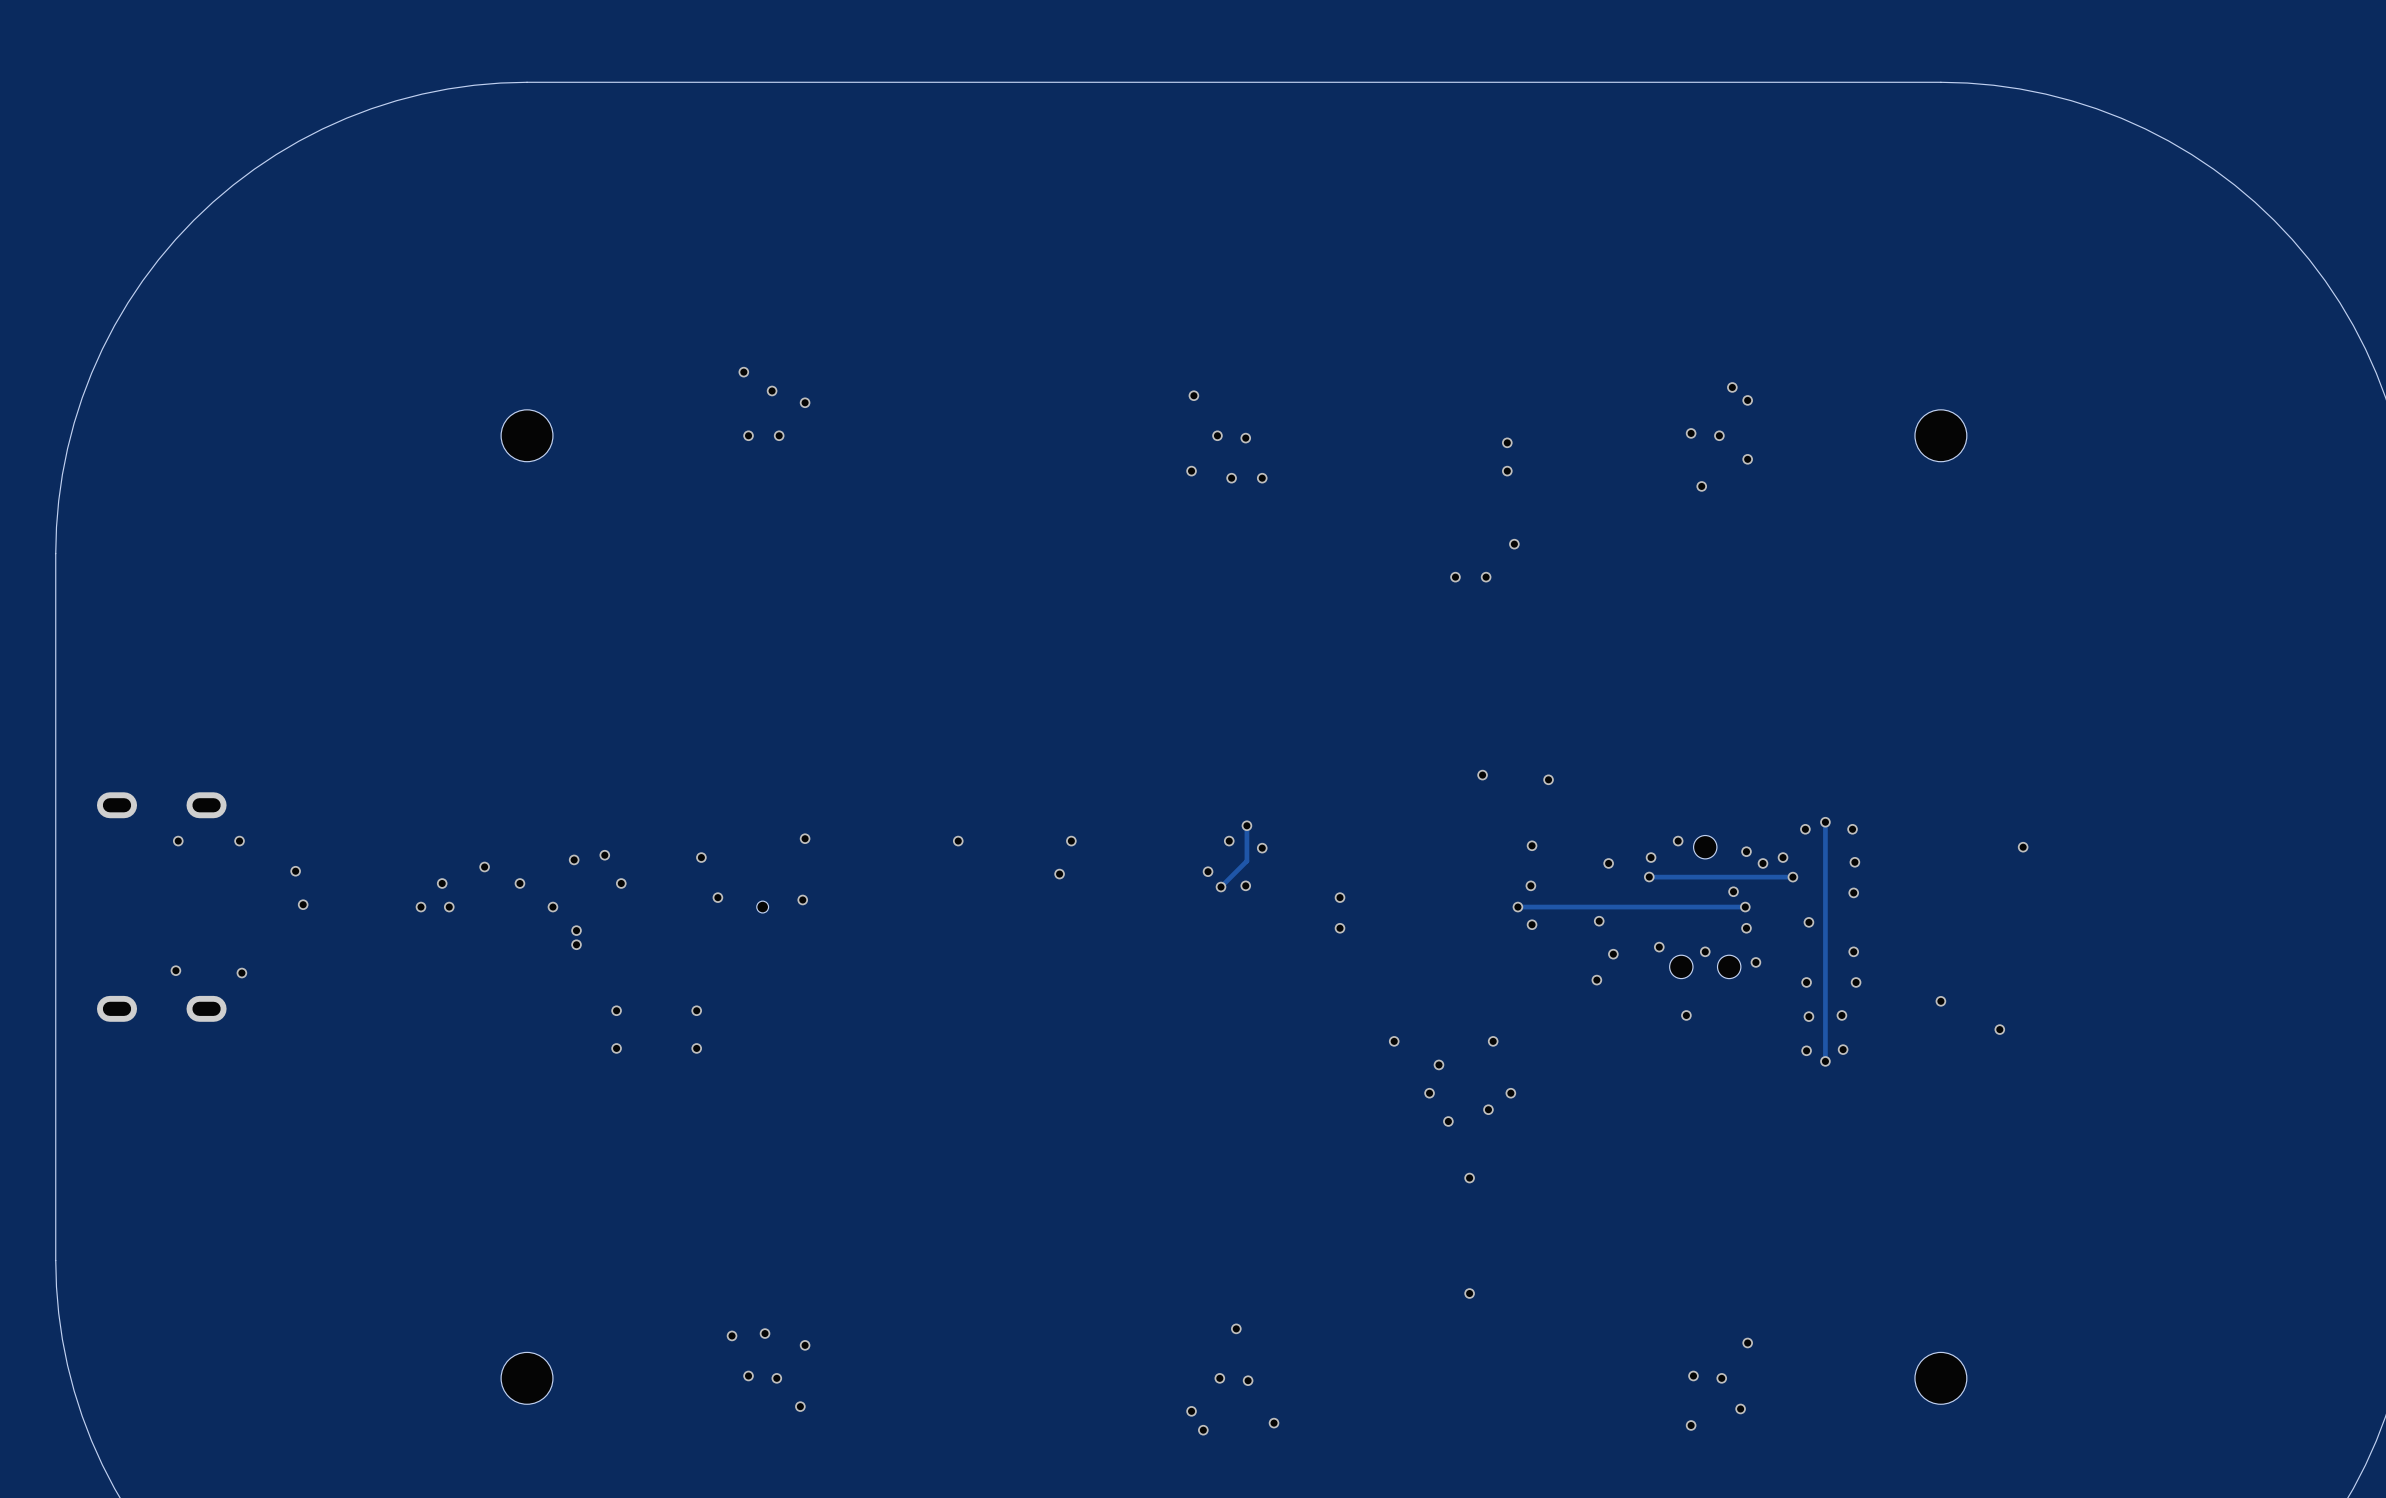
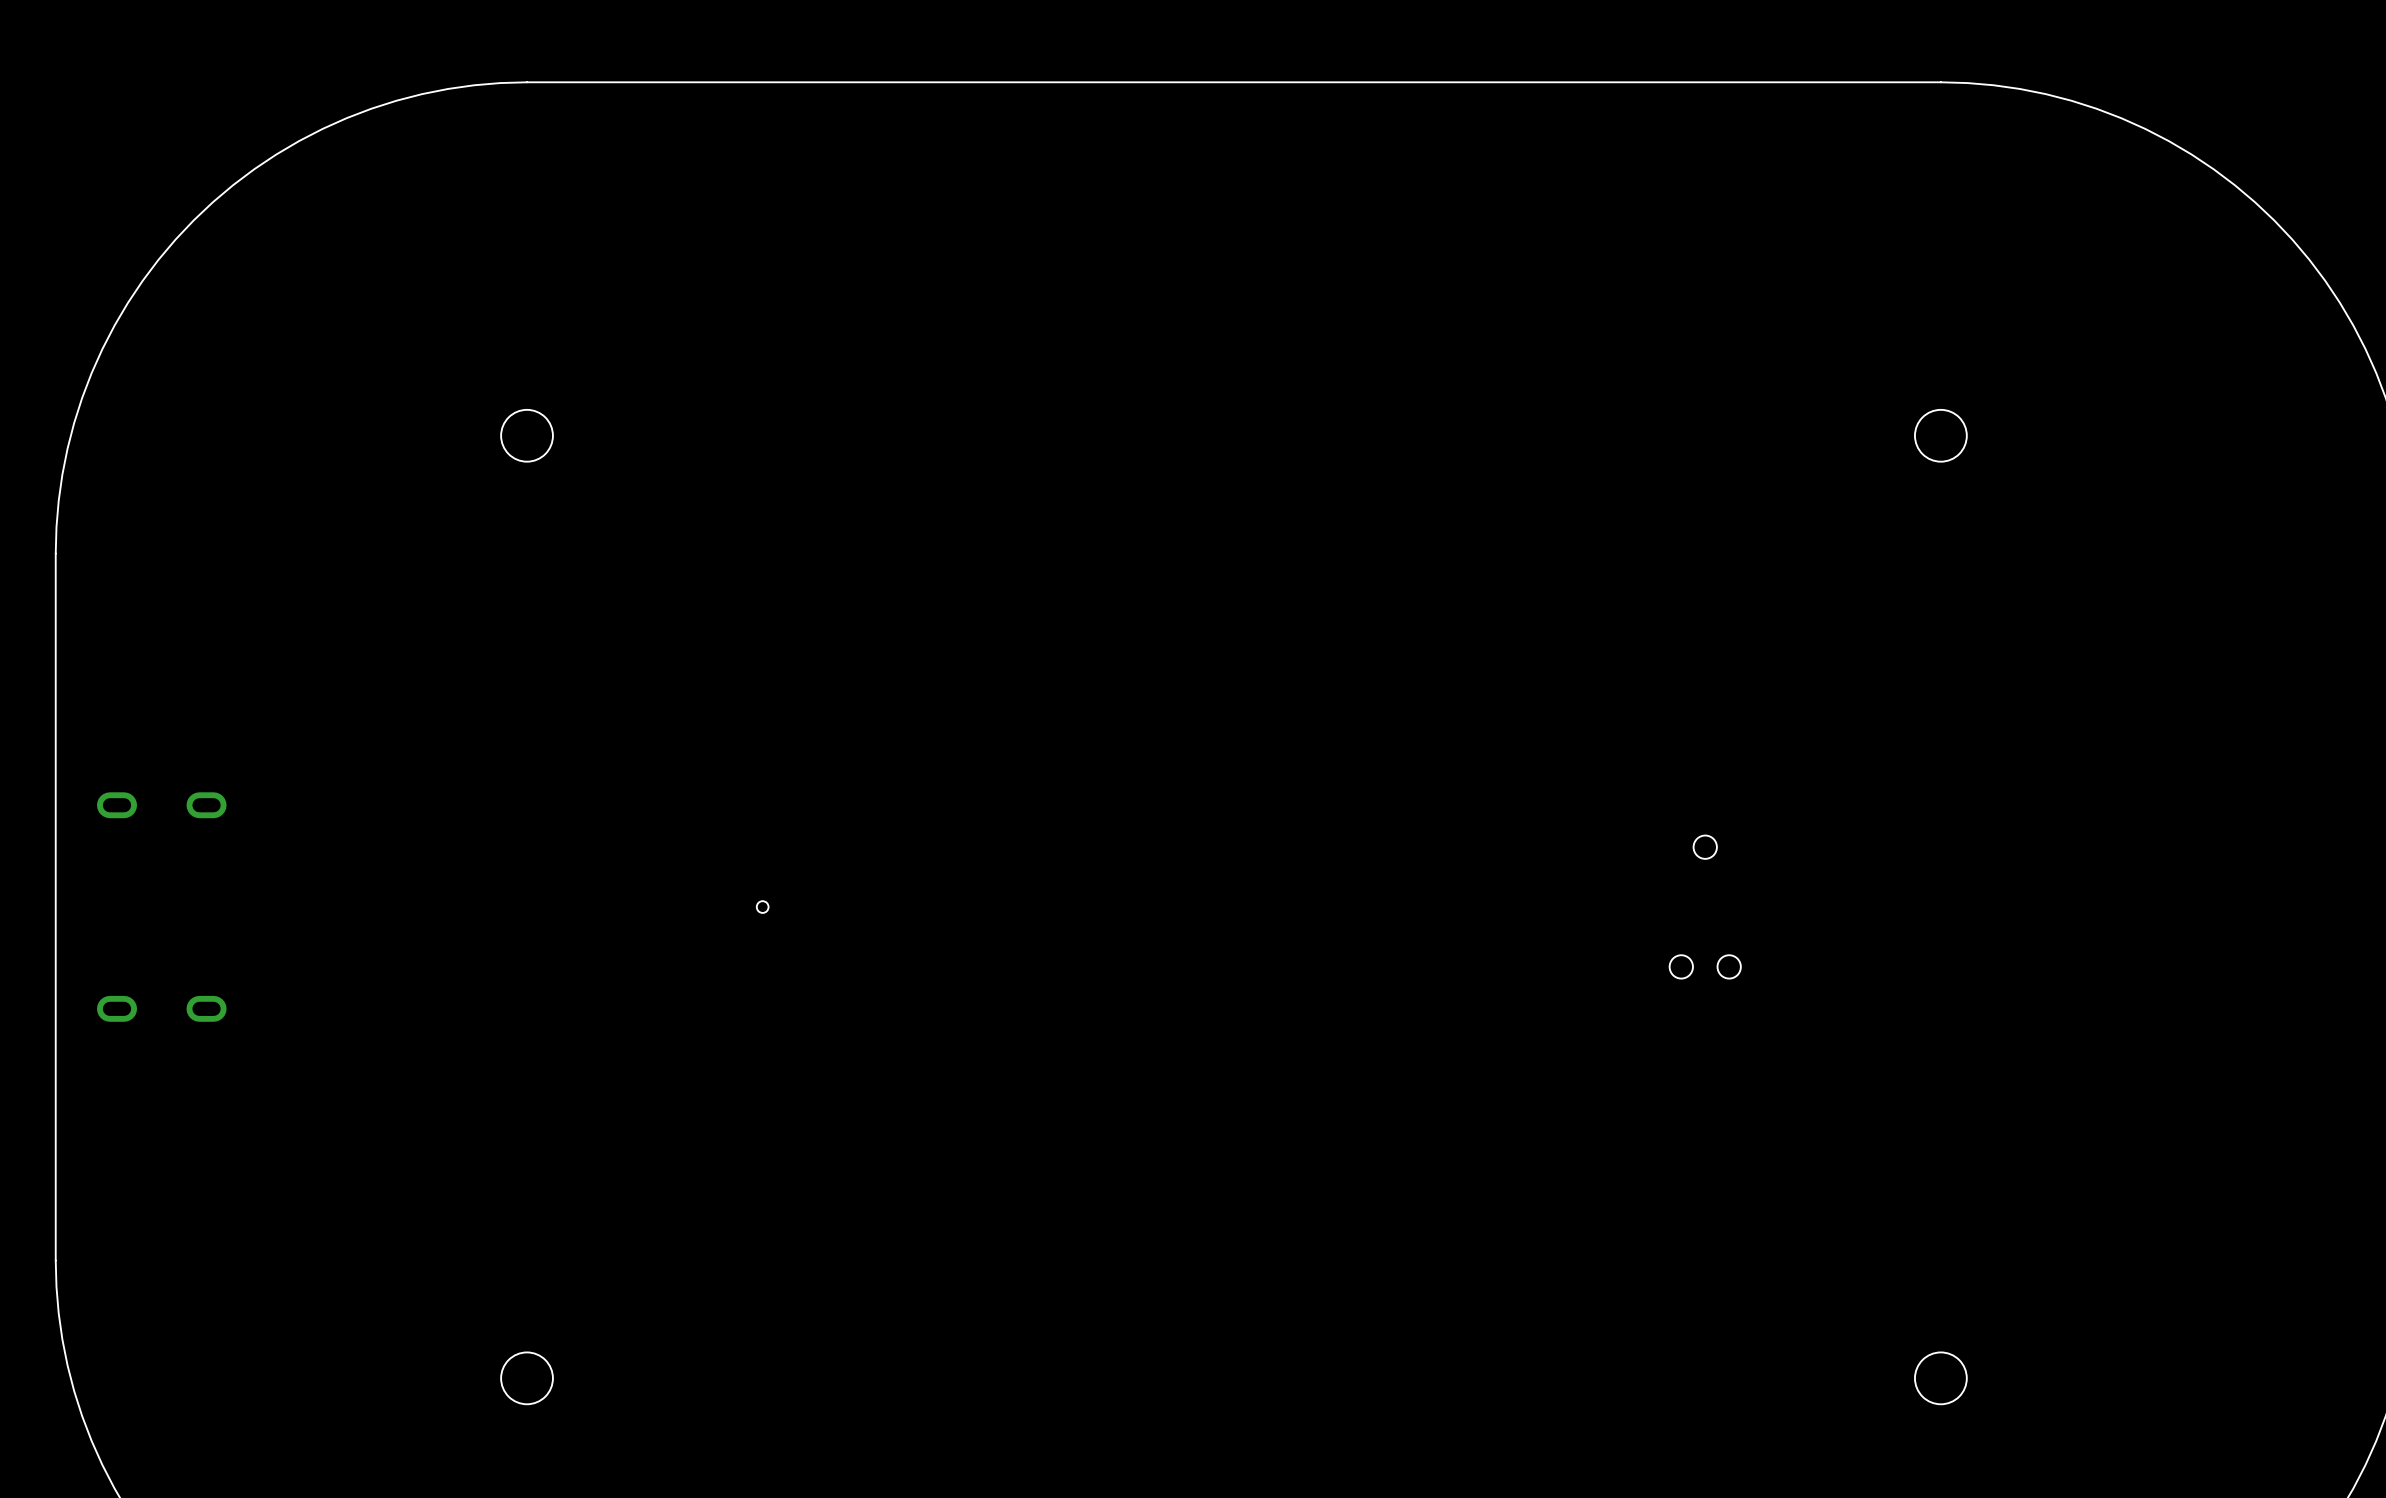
via: (743, 372) -> none
via: (1732, 387) -> none
via: (772, 390) -> none
via: (1193, 395) -> none
via: (1747, 400) -> none
via: (805, 402) -> none
via: (1691, 433) -> none
via: (748, 435) -> none
via: (779, 435) -> none
via: (1217, 435) -> none
via: (1719, 435) -> none
via: (1245, 438) -> none
via: (1507, 442) -> none
via: (1747, 459) -> none
via: (1191, 471) -> none
via: (1507, 471) -> none
via: (1231, 478) -> none
via: (1262, 478) -> none
via: (1701, 486) -> none
via: (1514, 544) -> none
via: (1455, 577) -> none
via: (1486, 577) -> none
via: (1482, 775) -> none
via: (1548, 779) -> none
track: (1825, 822) (1825, 1061) -> none
via: (1825, 822) -> none
track: (1246, 825) (1246, 861) (1221, 887) -> none
via: (1246, 825) -> none
via: (1805, 829) -> none
via: (1852, 829) -> none
via: (805, 838) -> none
via: (178, 841) -> none
via: (239, 841) -> none
via: (958, 841) -> none
via: (1071, 841) -> none
via: (1229, 841) -> none
via: (1678, 841) -> none
via: (1532, 845) -> none
via: (2023, 847) -> none
via: (1262, 848) -> none
via: (1746, 851) -> none
via: (604, 855) -> none
via: (701, 857) -> none
via: (1651, 857) -> none
via: (1783, 857) -> none
via: (574, 859) -> none
via: (1854, 862) -> none
via: (1608, 863) -> none
via: (1762, 863) -> none
via: (484, 866) -> none
via: (295, 871) -> none
via: (1208, 871) -> none
via: (1059, 874) -> none
via: (1649, 877) -> none
track: (1792, 877) (1649, 877) -> none
via: (1792, 877) -> none
via: (442, 883) -> none
via: (519, 883) -> none
via: (621, 883) -> none
via: (1245, 885) -> none
via: (1530, 885) -> none
via: (1221, 887) -> none
via: (1733, 891) -> none
via: (1853, 892) -> none
via: (717, 897) -> none
via: (1340, 897) -> none
via: (802, 899) -> none
via: (303, 904) -> none
via: (420, 907) -> none
via: (449, 907) -> none
via: (552, 907) -> none
via: (1517, 907) -> none
track: (1745, 907) (1517, 907) -> none
via: (1745, 907) -> none
via: (1599, 921) -> none
via: (1808, 922) -> none
via: (1532, 924) -> none
via: (1340, 928) -> none
via: (1746, 928) -> none
via: (576, 930) -> none
via: (576, 944) -> none
via: (1659, 947) -> none
via: (1705, 951) -> none
via: (1853, 951) -> none
via: (1613, 954) -> none
via: (1755, 962) -> none
via: (175, 970) -> none
via: (241, 973) -> none
via: (1596, 980) -> none
via: (1806, 982) -> none
via: (1856, 982) -> none
via: (1940, 1001) -> none
via: (616, 1010) -> none
via: (696, 1010) -> none
via: (1686, 1015) -> none
via: (1841, 1015) -> none
via: (1808, 1016) -> none
via: (1999, 1029) -> none
via: (1394, 1041) -> none
via: (1493, 1041) -> none
via: (616, 1048) -> none
via: (696, 1048) -> none
via: (1843, 1049) -> none
via: (1806, 1050) -> none
via: (1825, 1061) -> none
via: (1438, 1064) -> none
via: (1429, 1093) -> none
via: (1510, 1093) -> none
via: (1488, 1109) -> none
via: (1448, 1121) -> none
via: (1469, 1178) -> none
via: (1469, 1293) -> none
via: (1236, 1328) -> none
via: (765, 1333) -> none
via: (732, 1335) -> none
via: (1747, 1342) -> none
via: (805, 1345) -> none
via: (748, 1375) -> none
via: (1693, 1375) -> none
via: (776, 1378) -> none
via: (1219, 1378) -> none
via: (1721, 1378) -> none
via: (1248, 1380) -> none
via: (800, 1406) -> none
via: (1740, 1408) -> none
via: (1191, 1411) -> none
via: (1274, 1423) -> none
via: (1691, 1425) -> none
via: (1203, 1430) -> none

